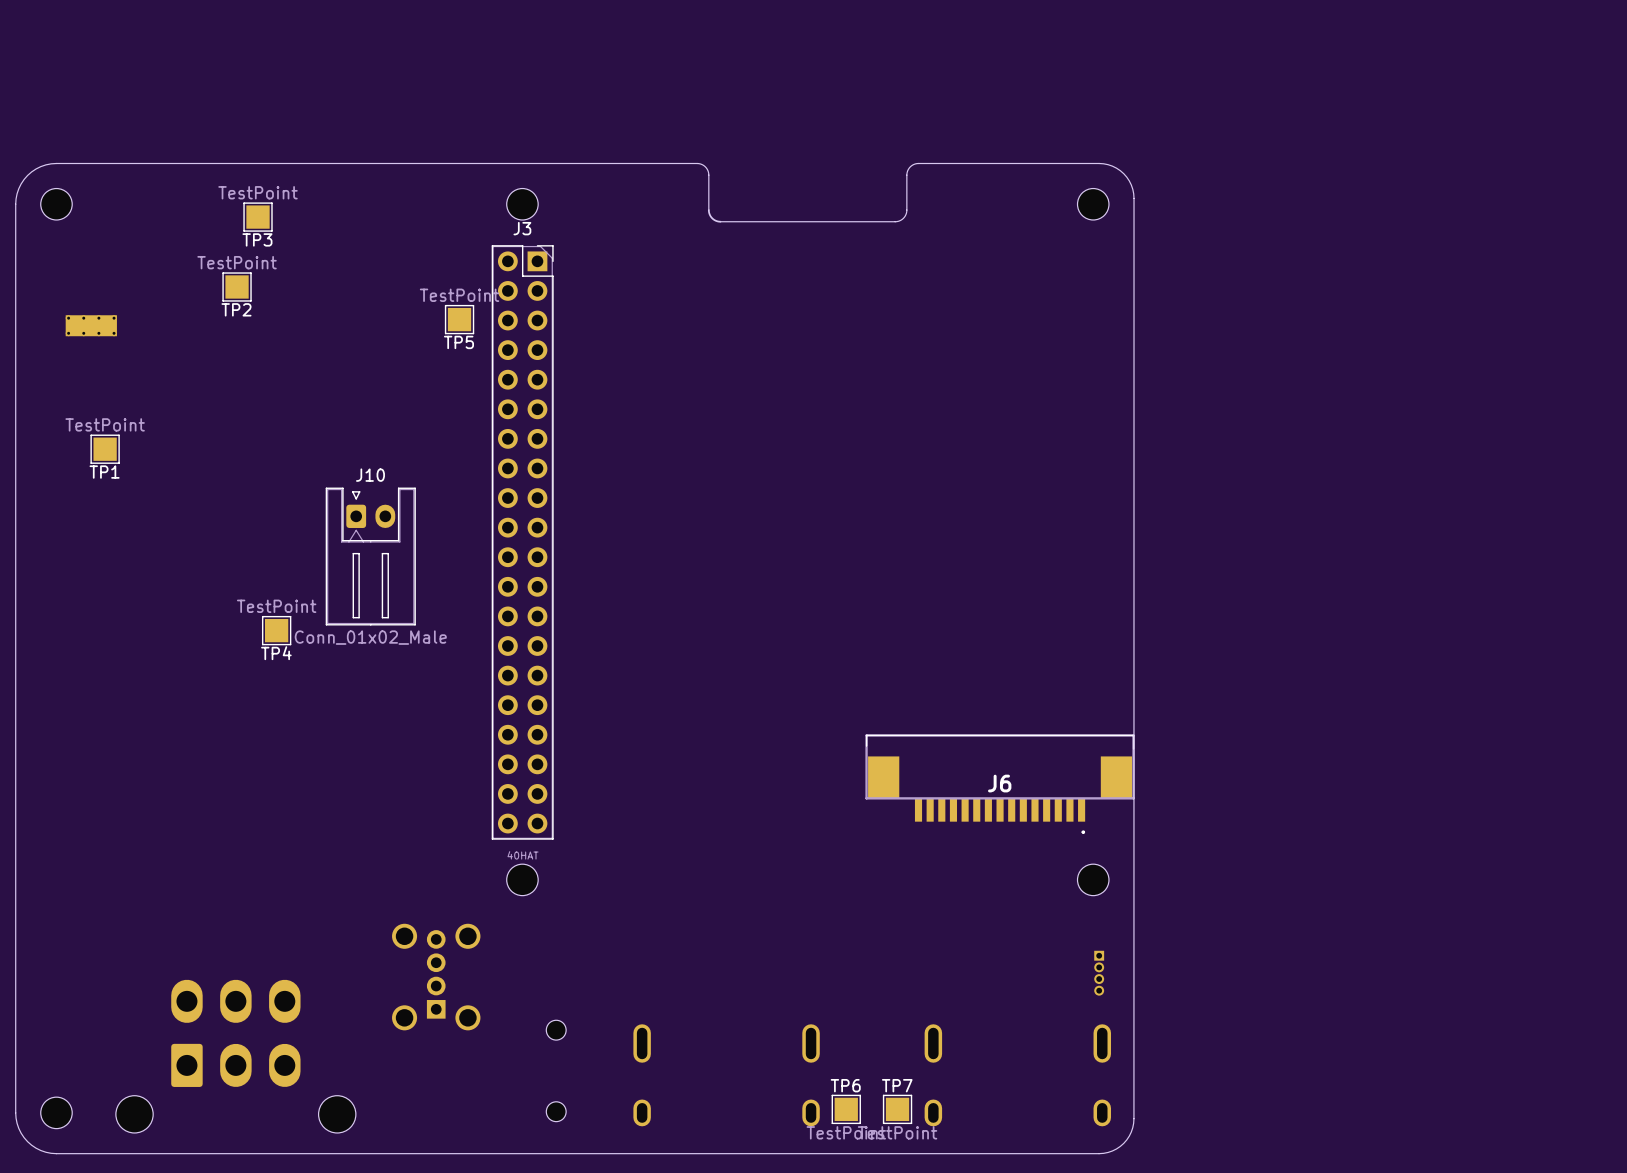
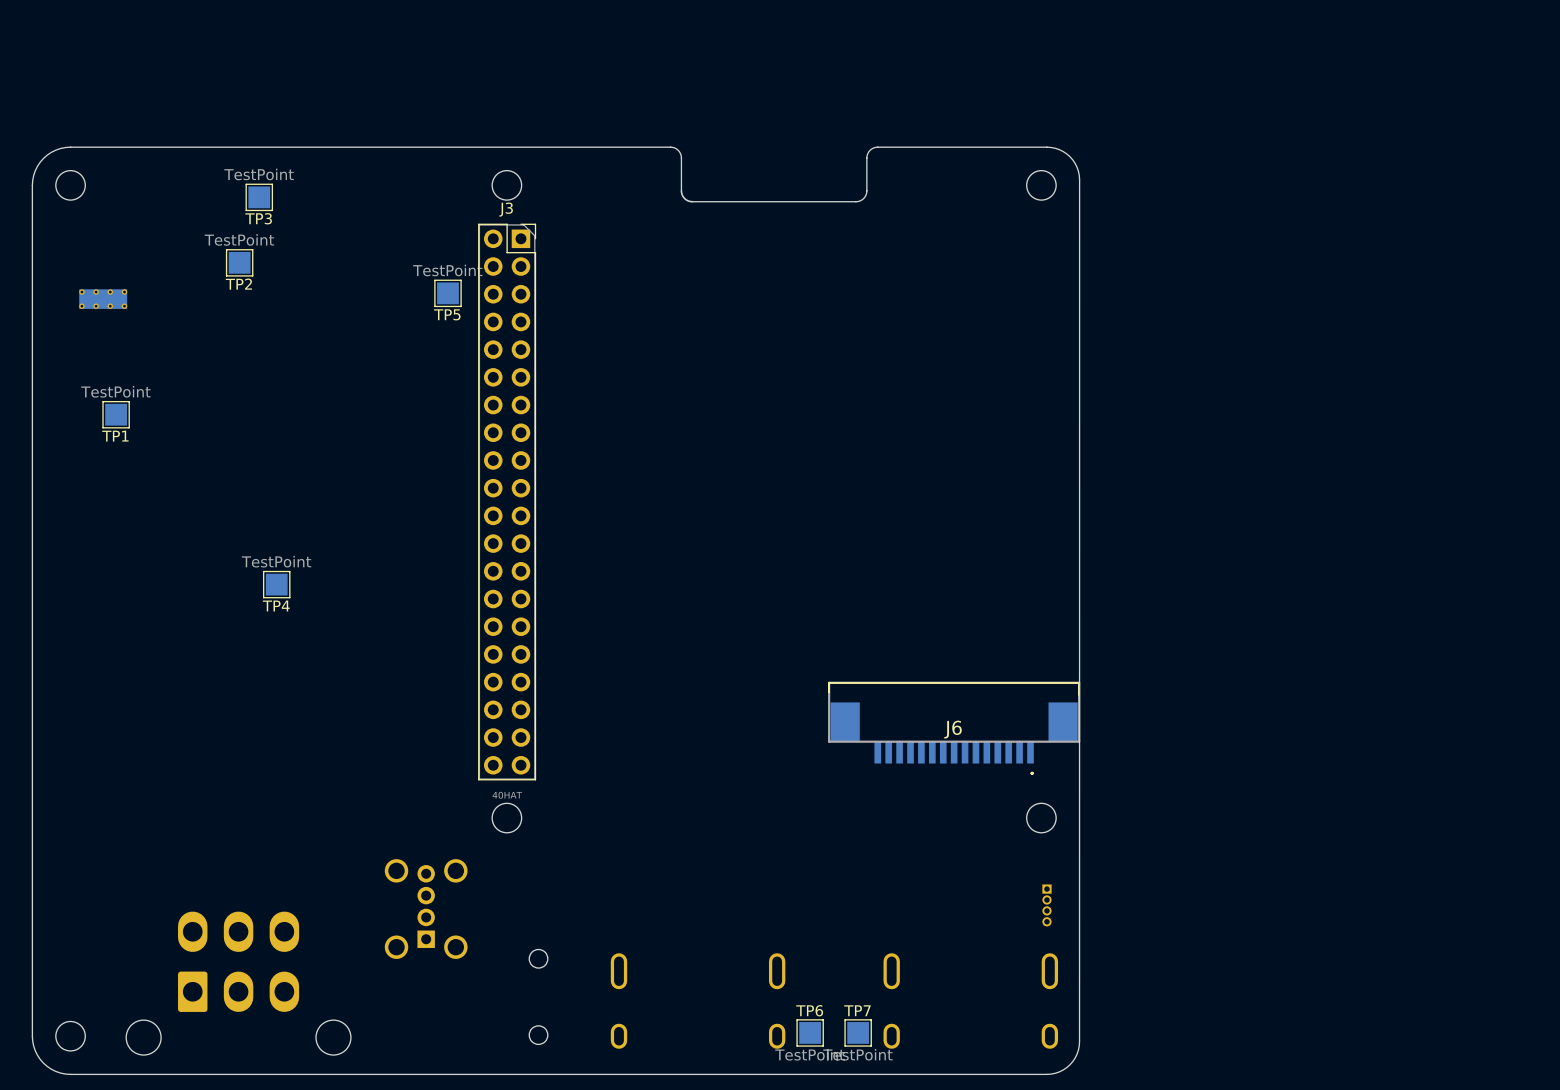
J10: Conn_01x02_Male (370, 556) -> none

